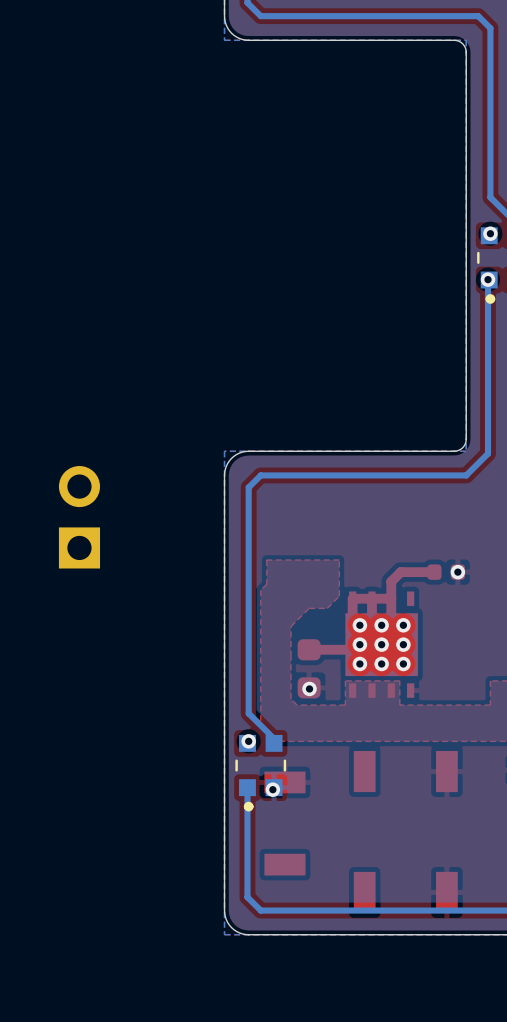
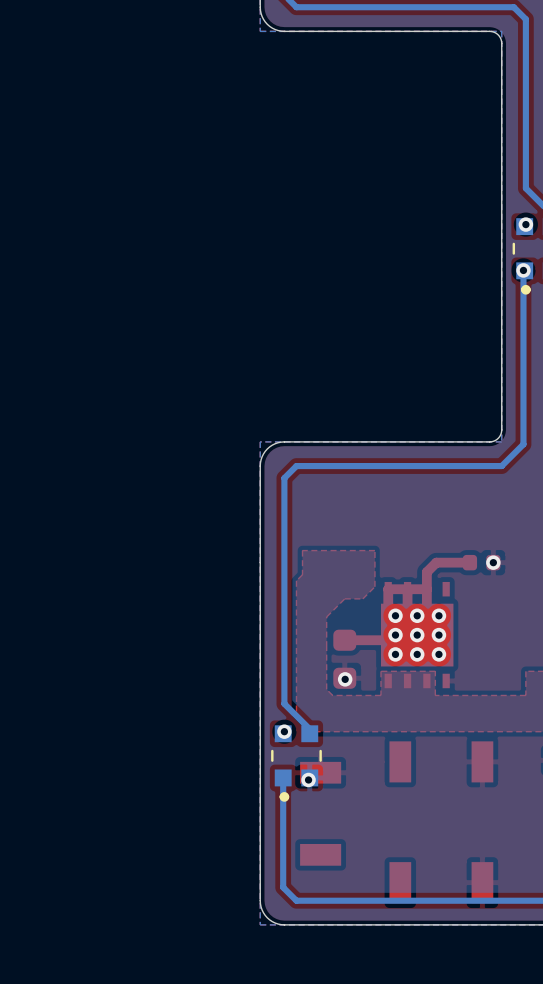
part: (79, 517) -> none

